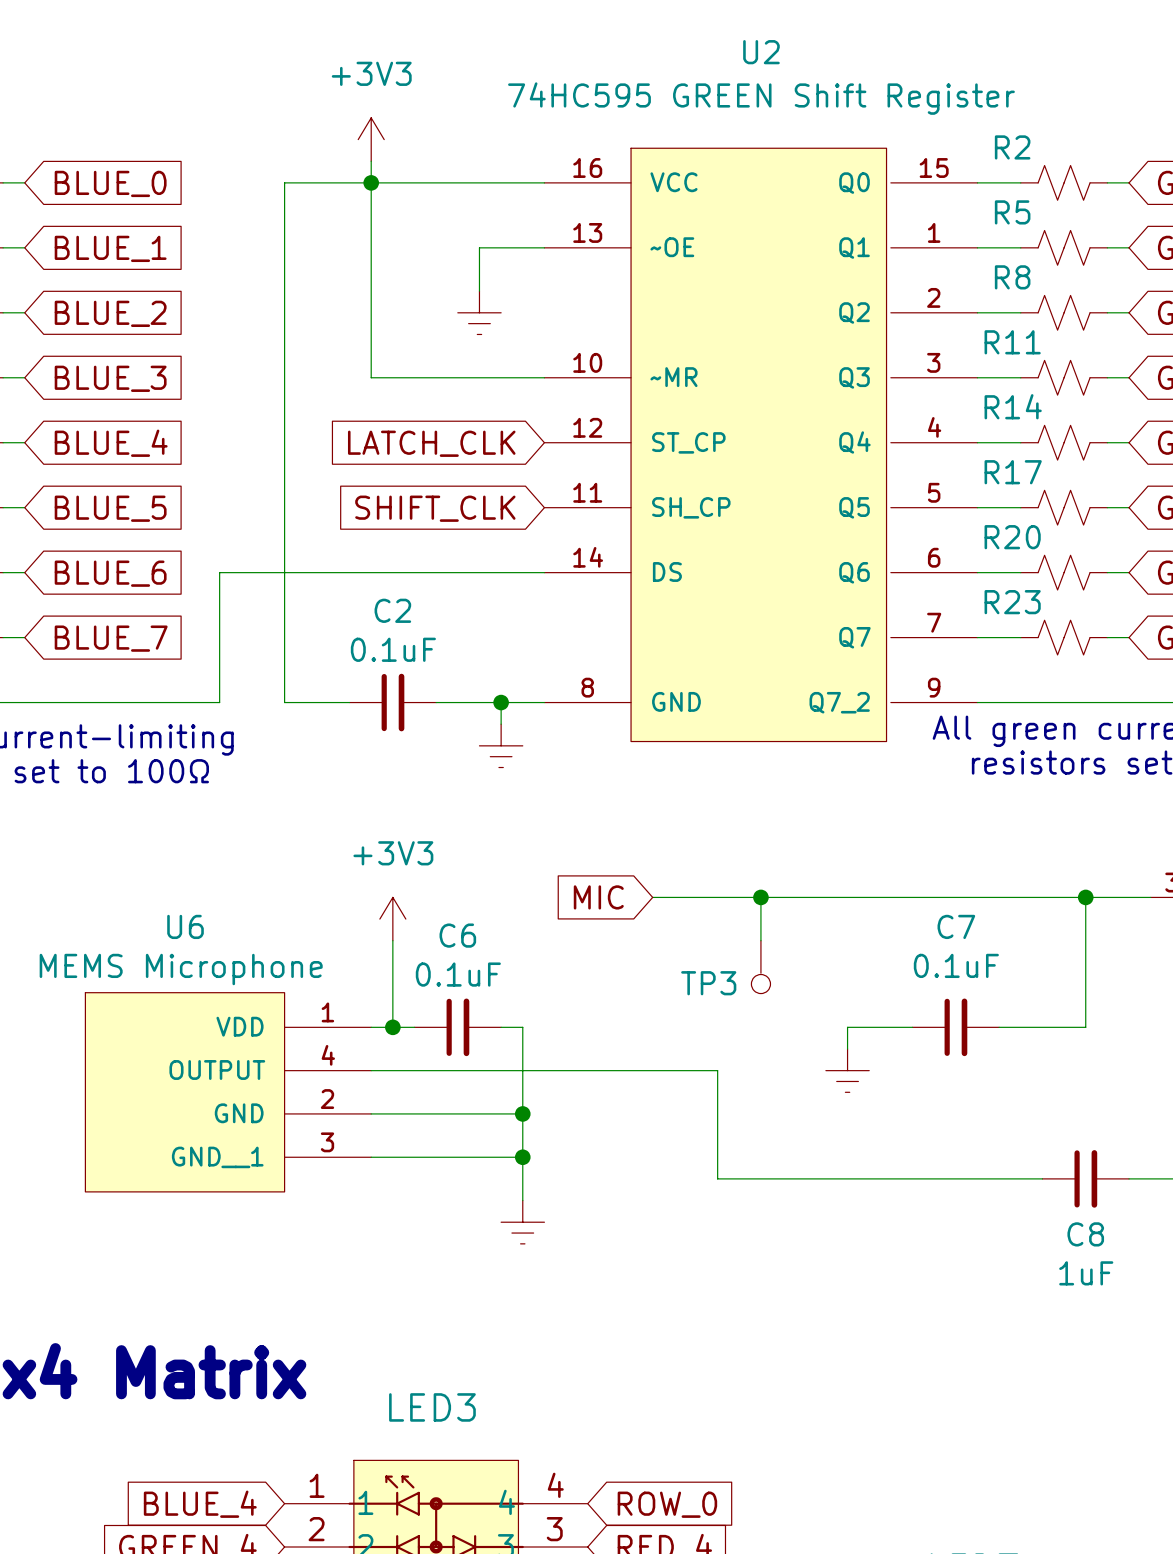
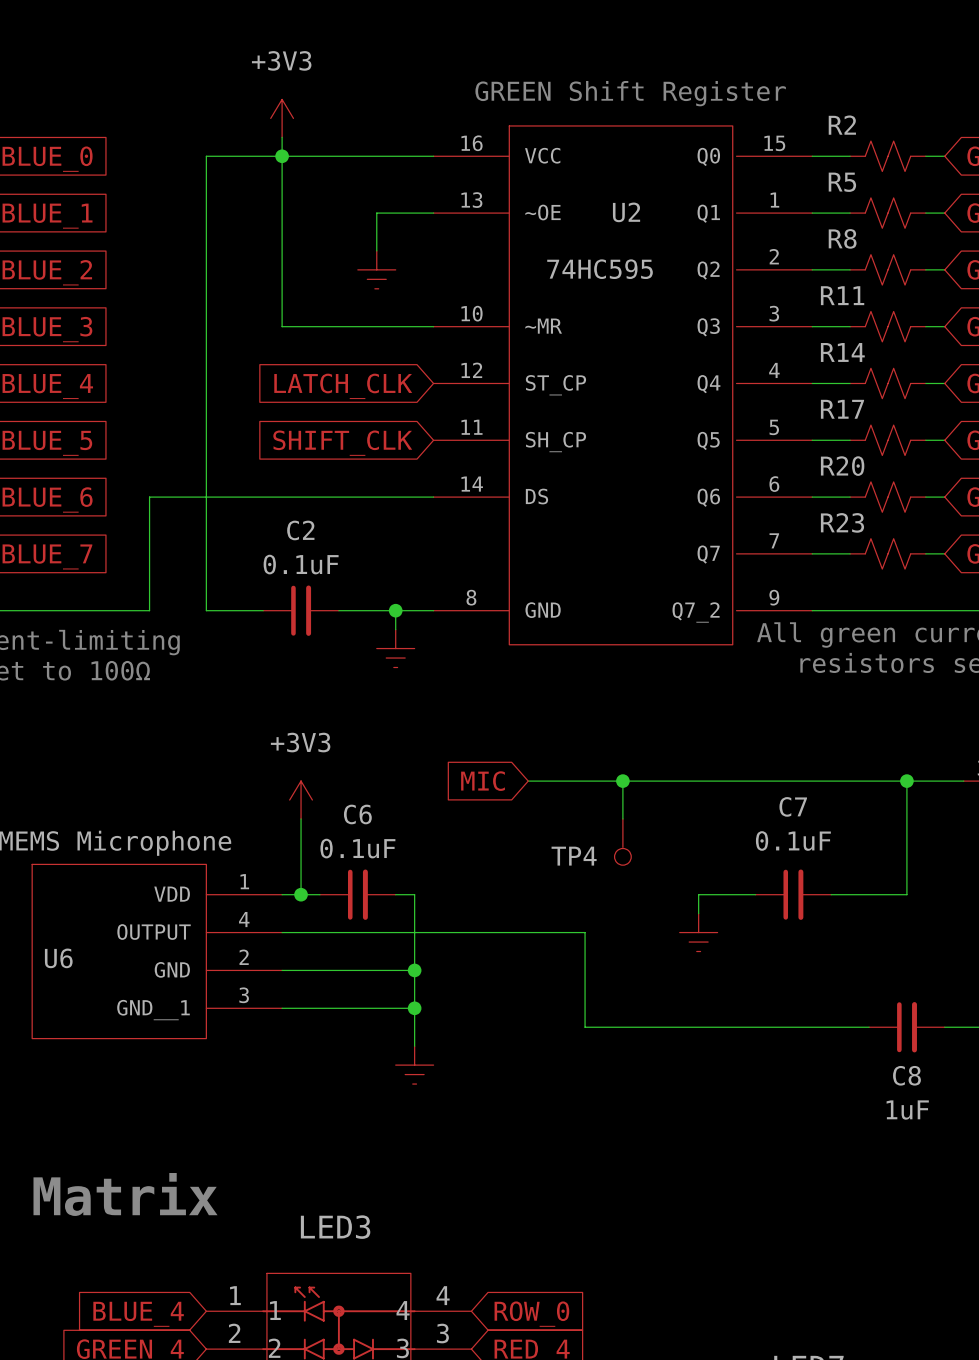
U2 name position: U2 (761, 52) -> U2 (626, 212)
U2 value: 74HC595 GREEN Shift Register (761, 98) -> 74HC595 (600, 269)
text: none -> GREEN Shift Register (630, 93)
U6 name position: U6 (185, 926) -> U6 (58, 958)
TP3 name: TP3 (708, 983) -> TP4 (574, 856)

